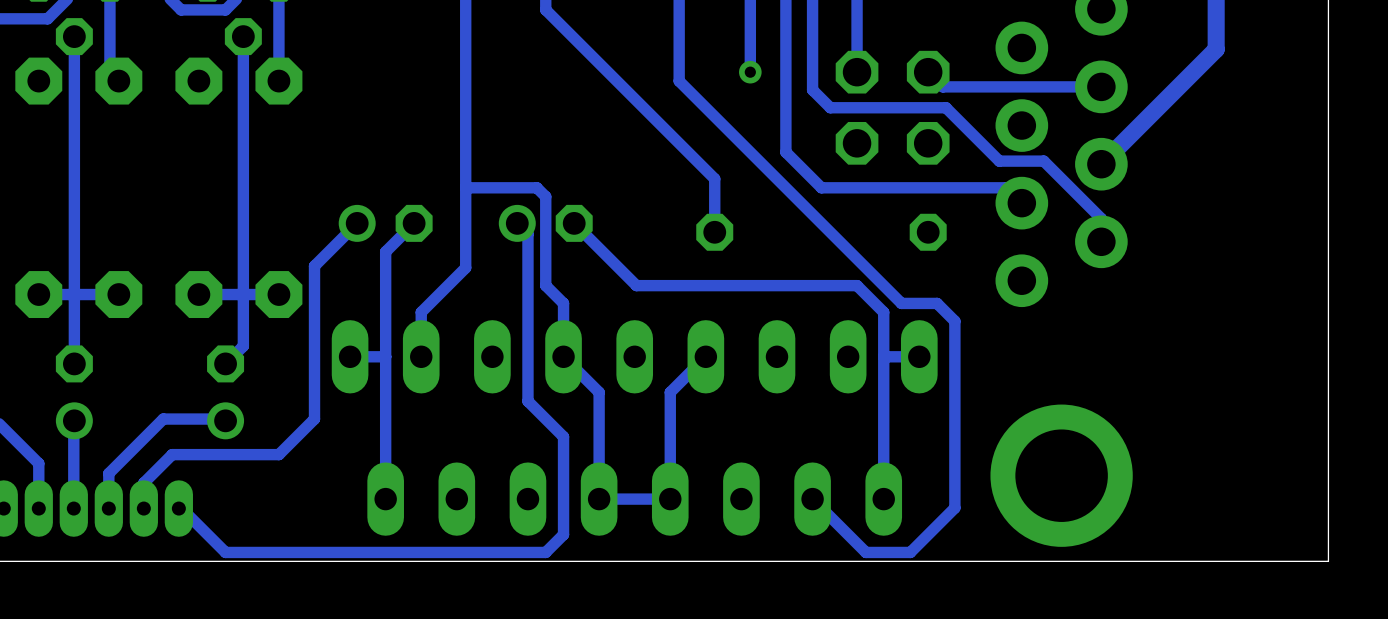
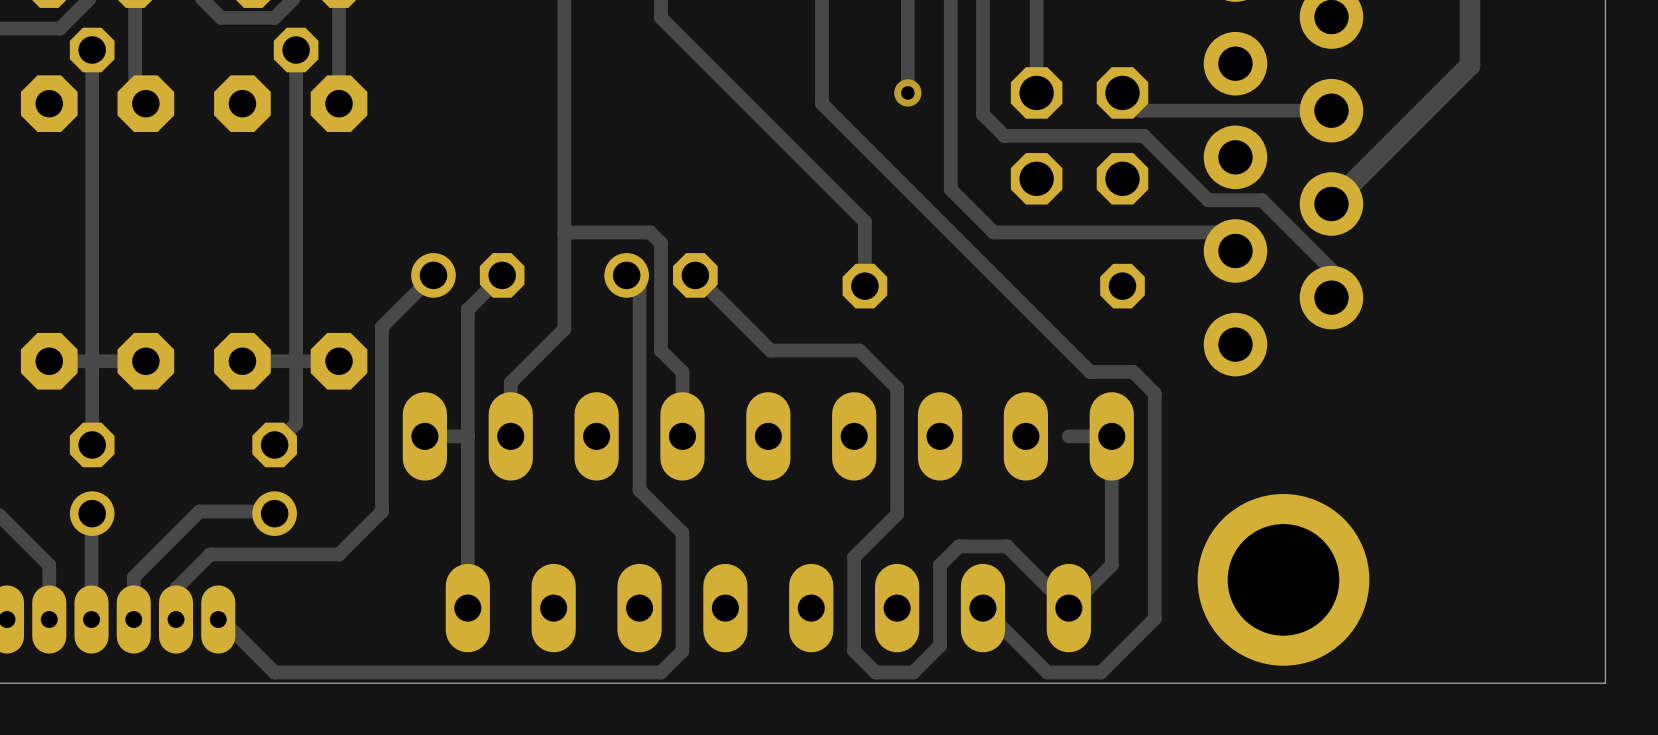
track: (710, 285) (857, 285) (883, 312) (883, 499) -> (859, 350) (897, 388) (897, 514) (854, 557) (854, 651) (875, 672) (913, 672) (940, 645) (940, 565) (958, 546) (1007, 546) (1068, 608) (1111, 565) (1111, 436)
track: (705, 356) (670, 392) (670, 499) (599, 499) (599, 392) (563, 356) -> none

